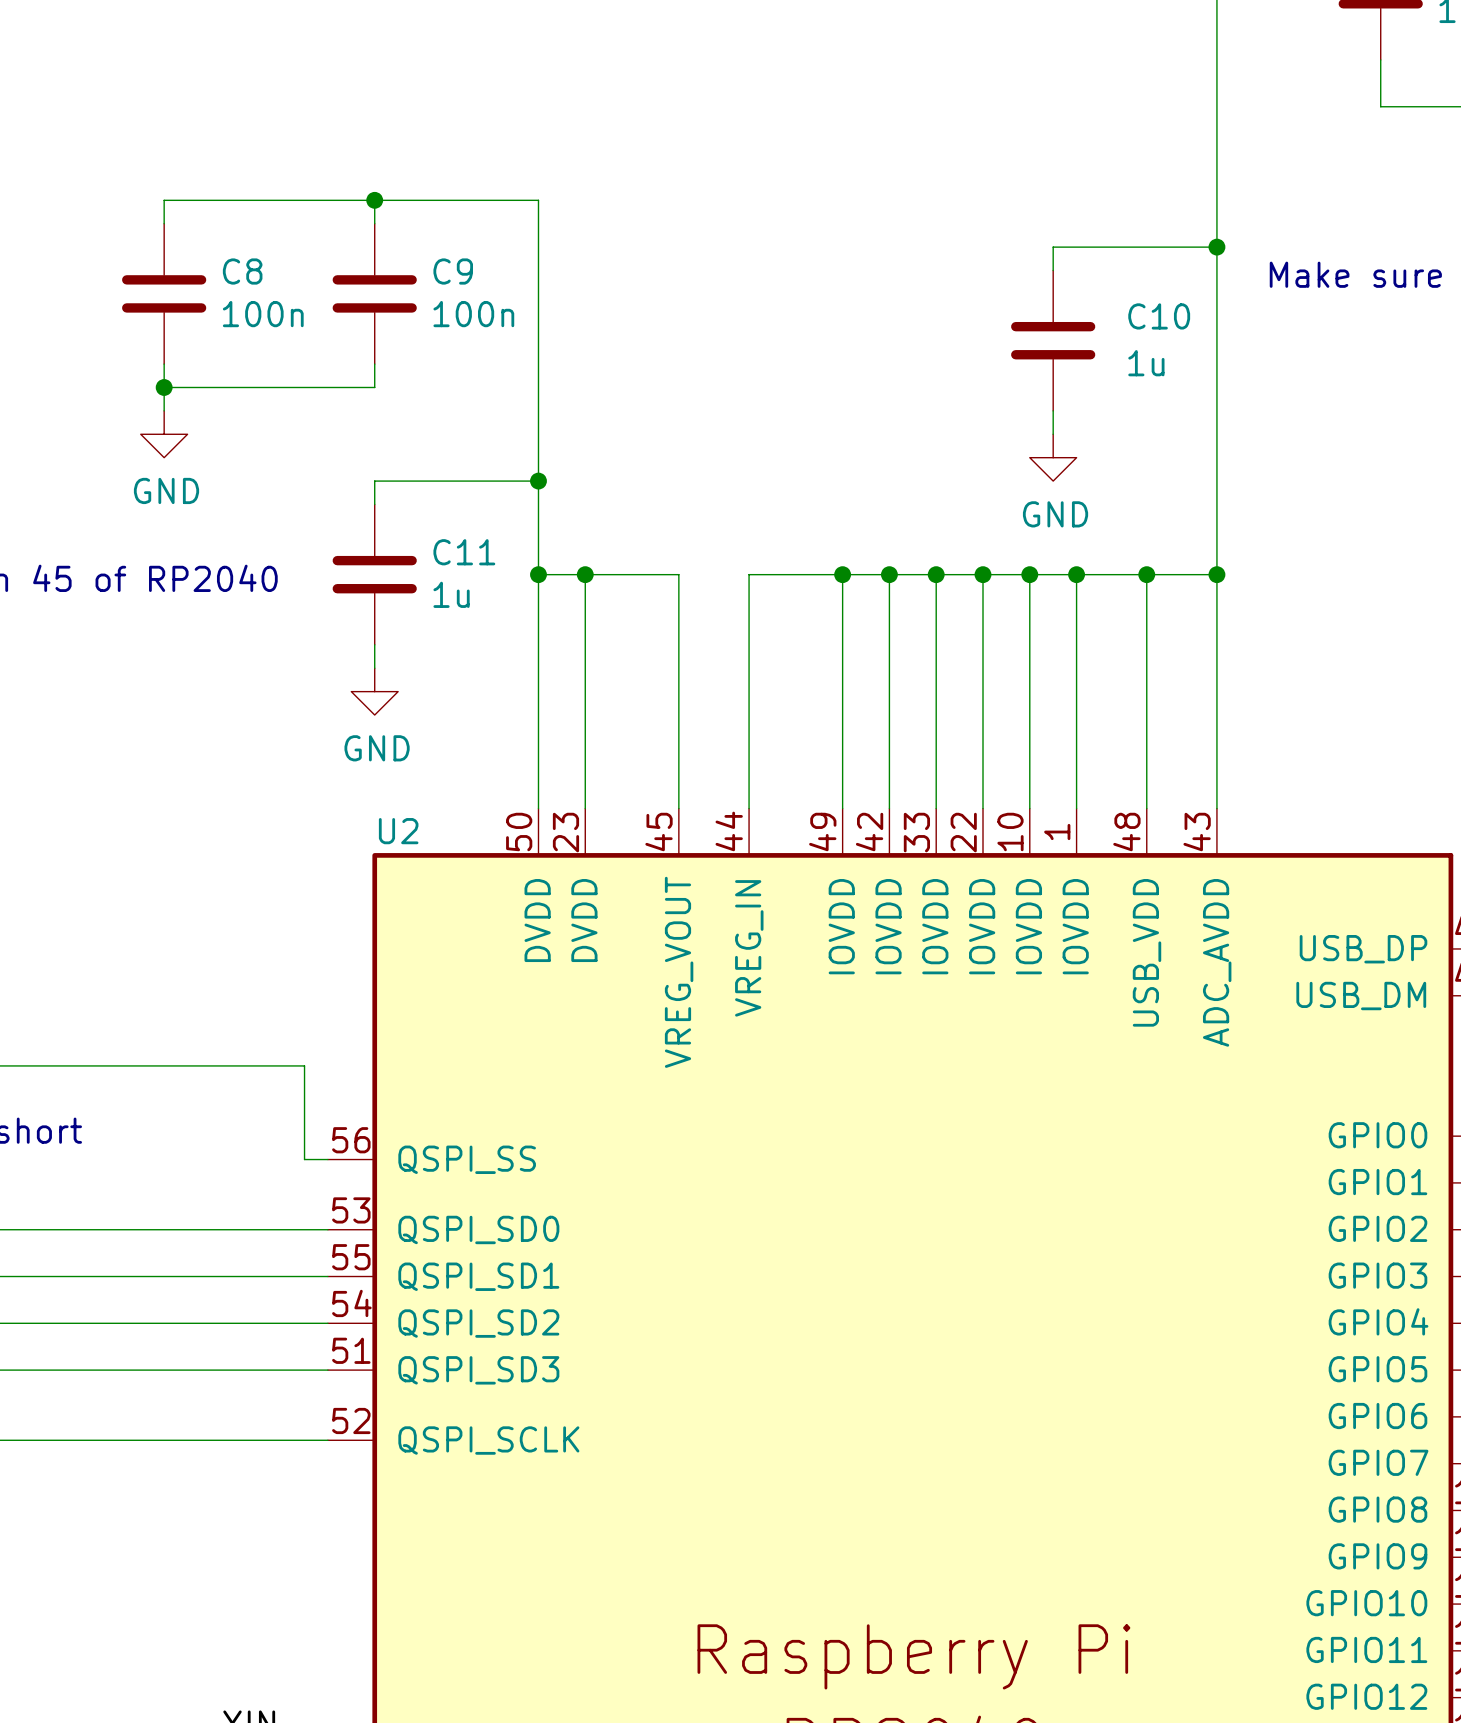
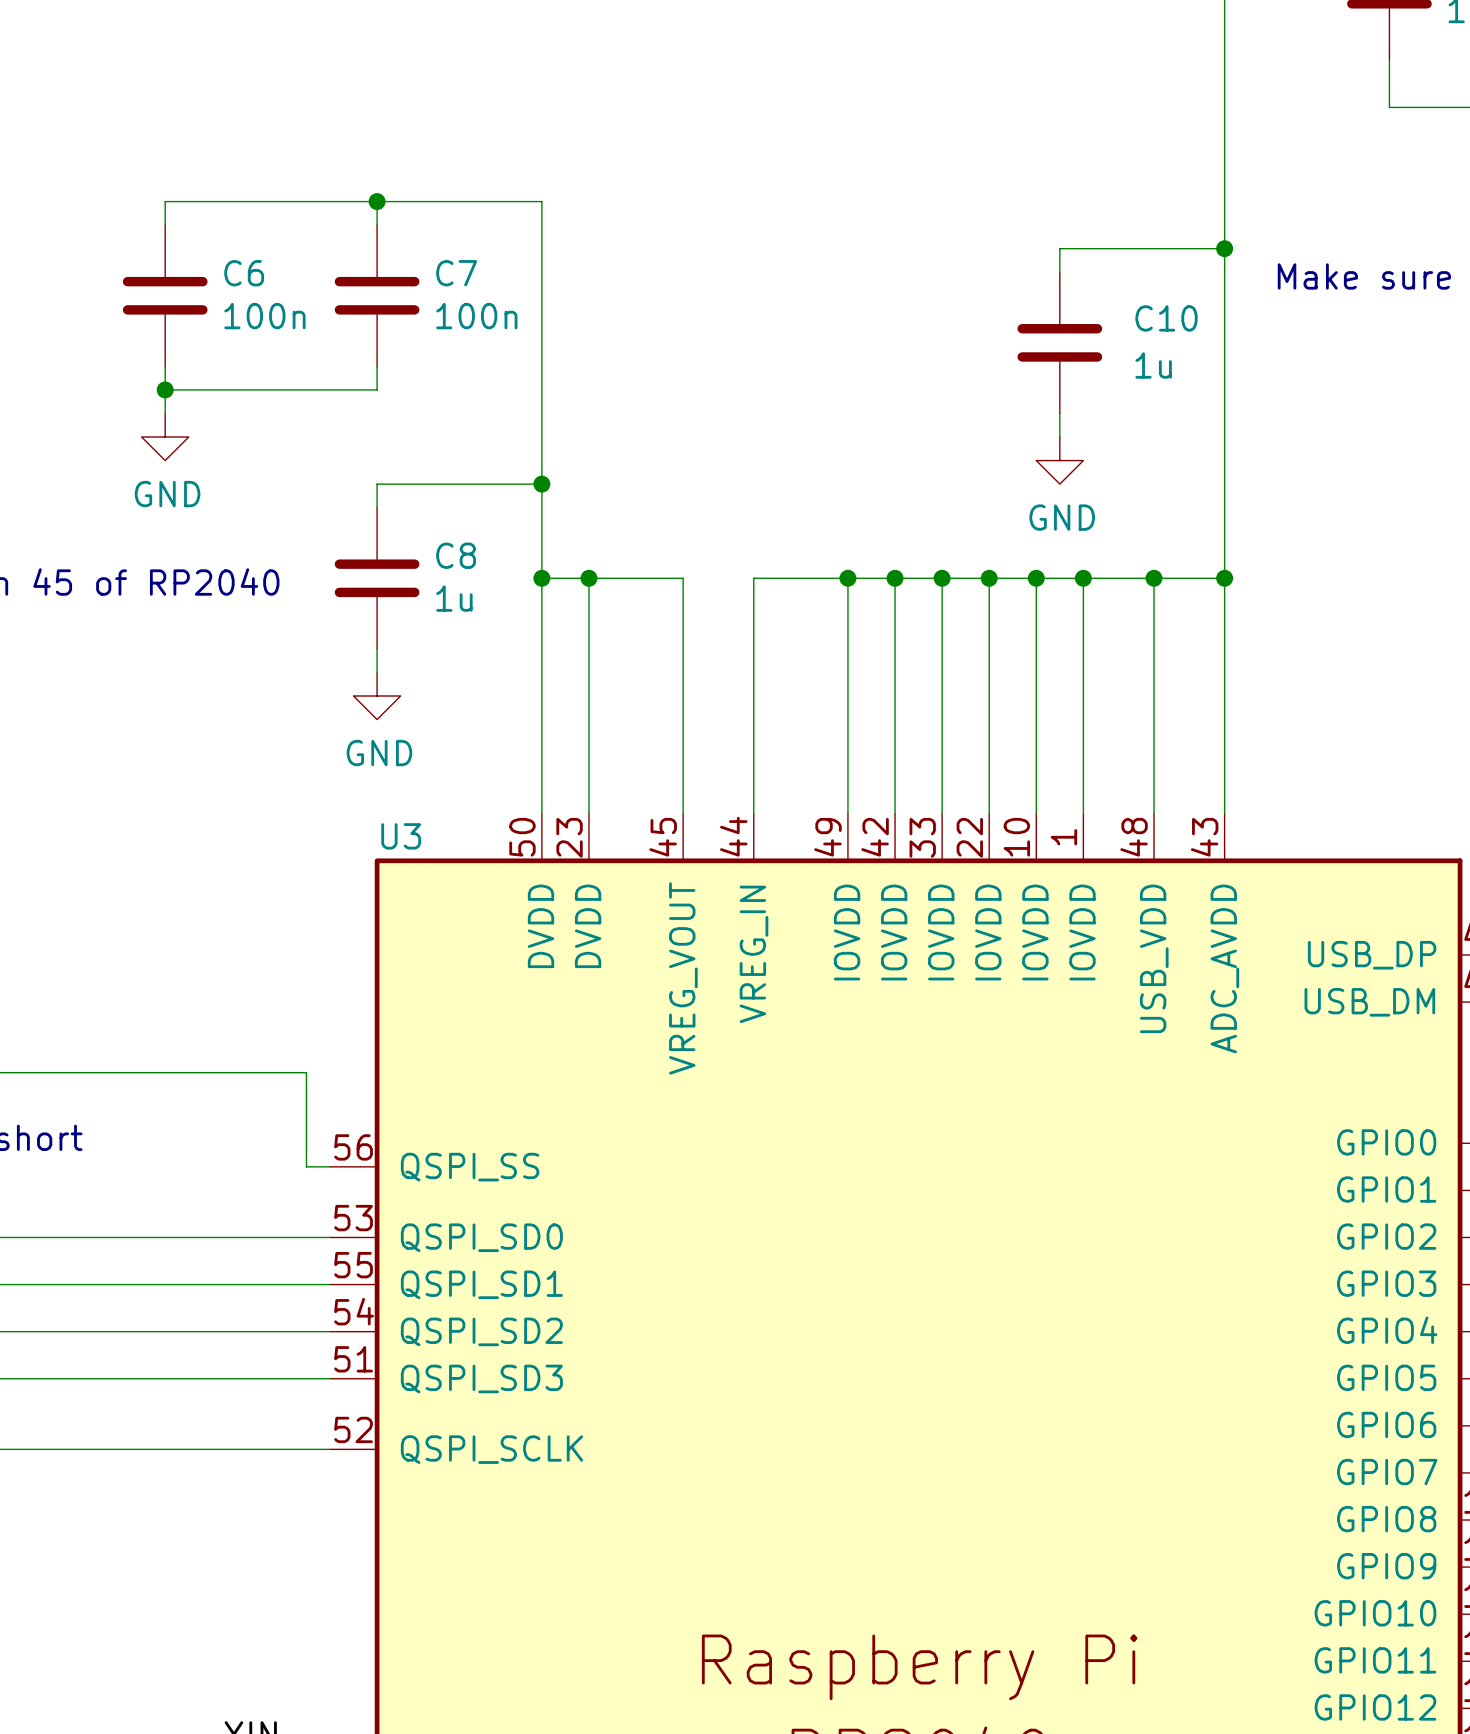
C8 name: C8 (242, 271) -> C6 (244, 273)
C9 name: C9 (453, 271) -> C7 (456, 273)
C11 name: C11 (464, 552) -> C8 (456, 555)
U2 name: U2 (398, 831) -> U3 (401, 836)

